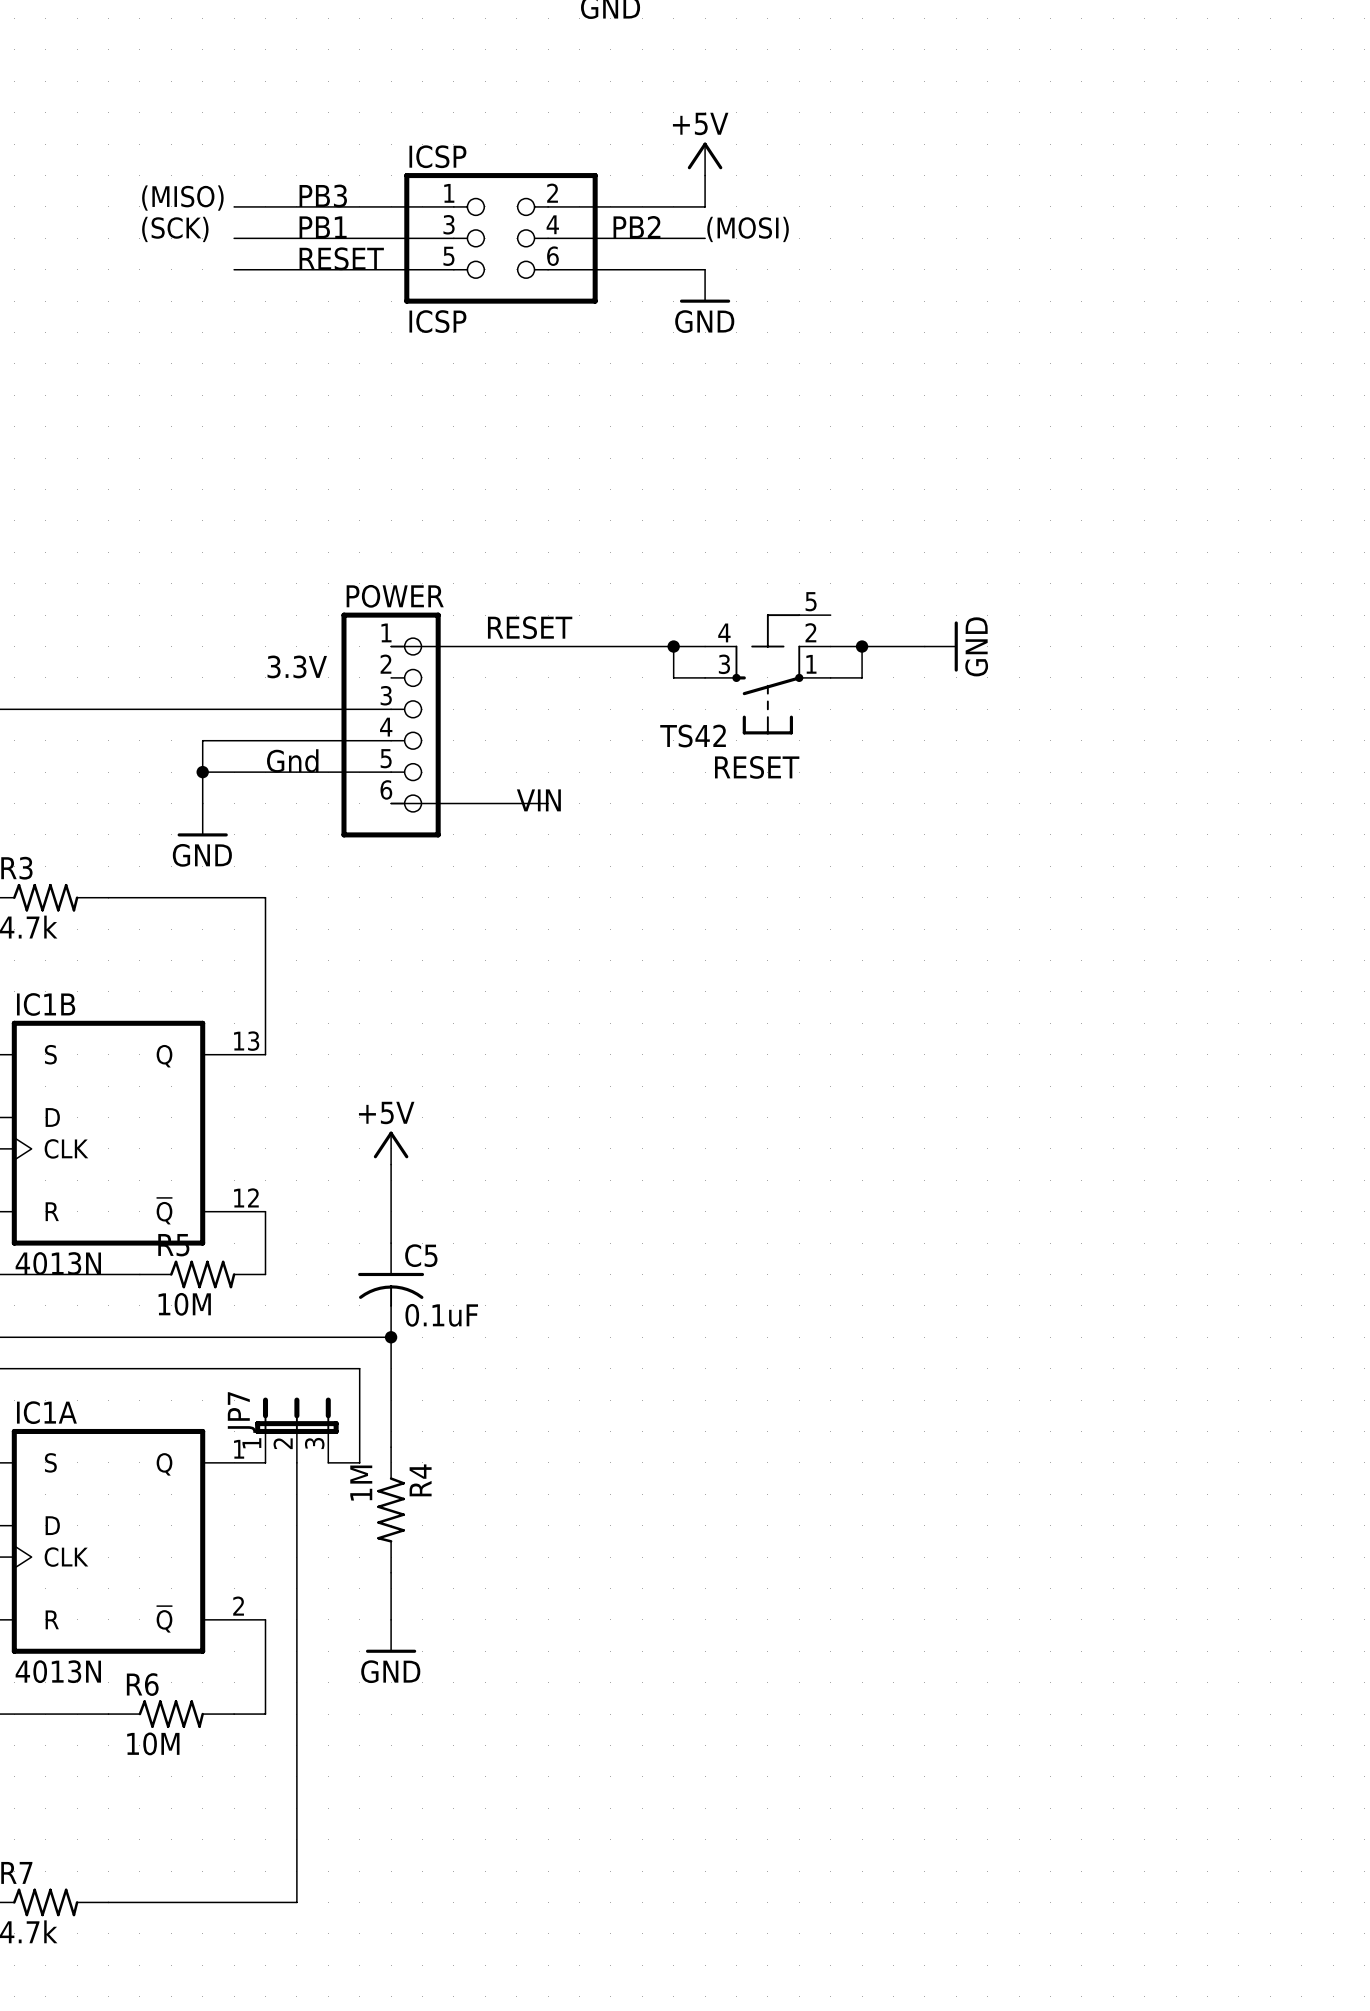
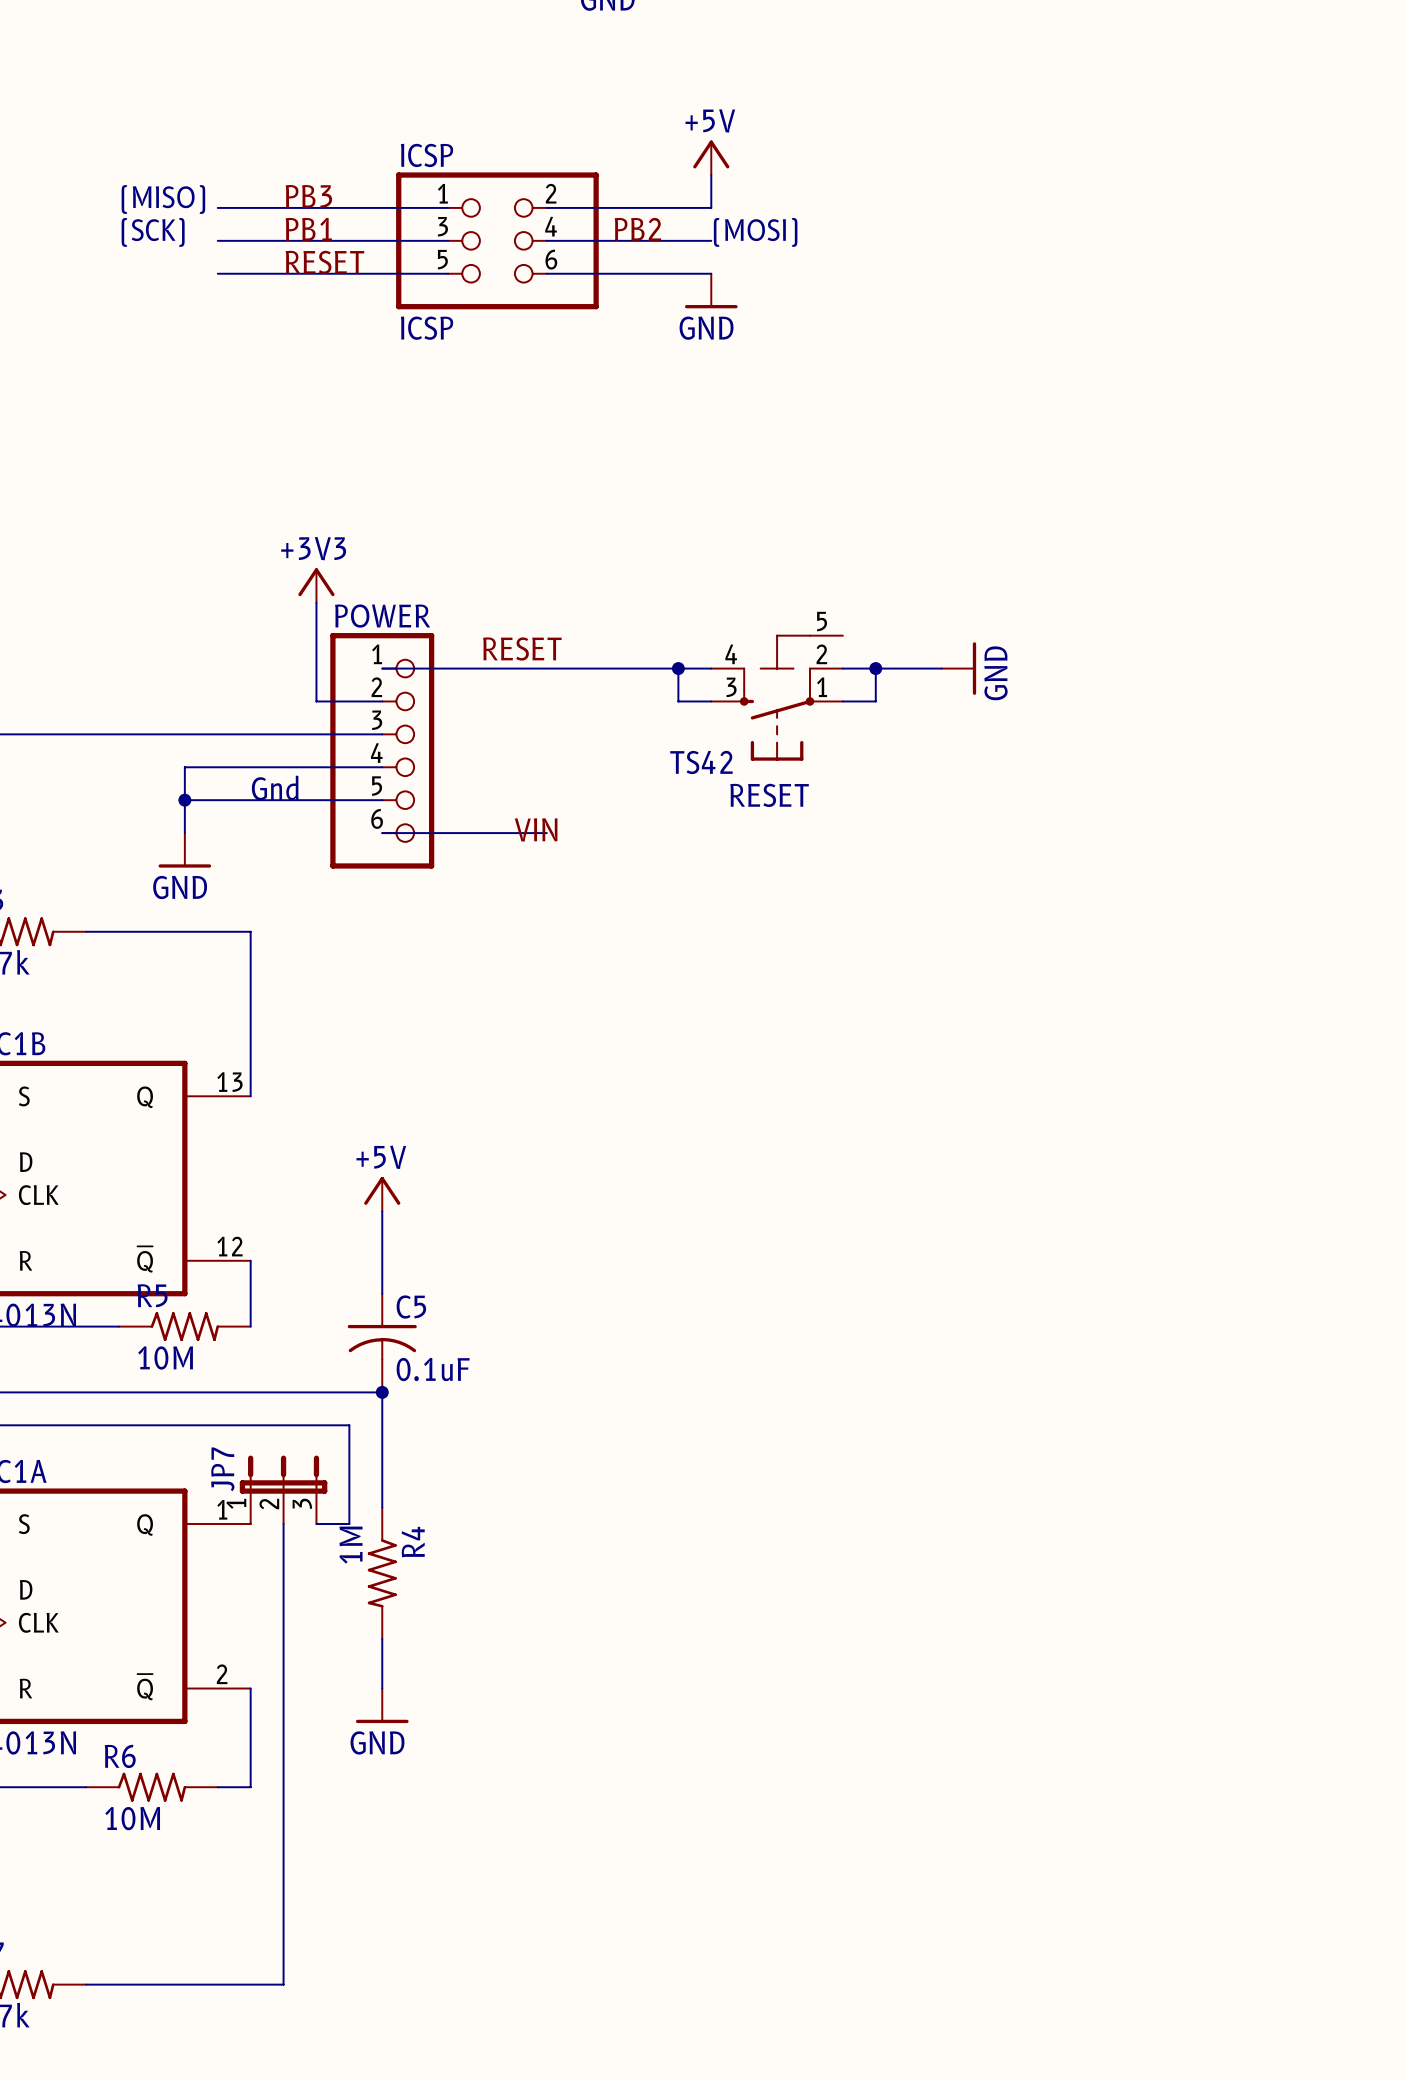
power symbol: none -> +3V3 (316, 585)
wire: none -> (316, 602) (316, 701) (382, 701)
text: 3.3V (297, 666) -> none

